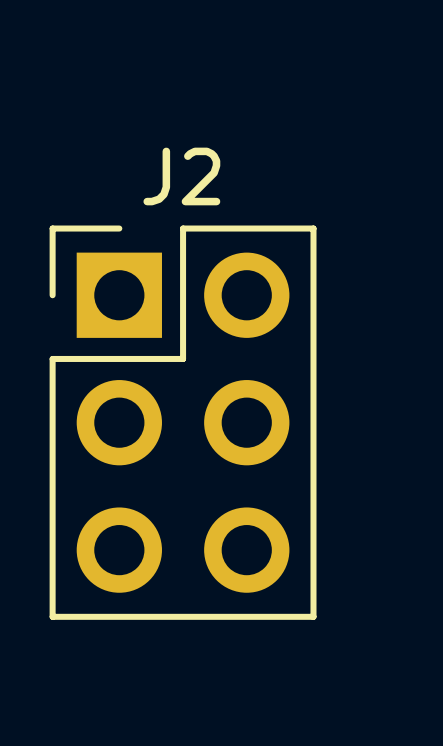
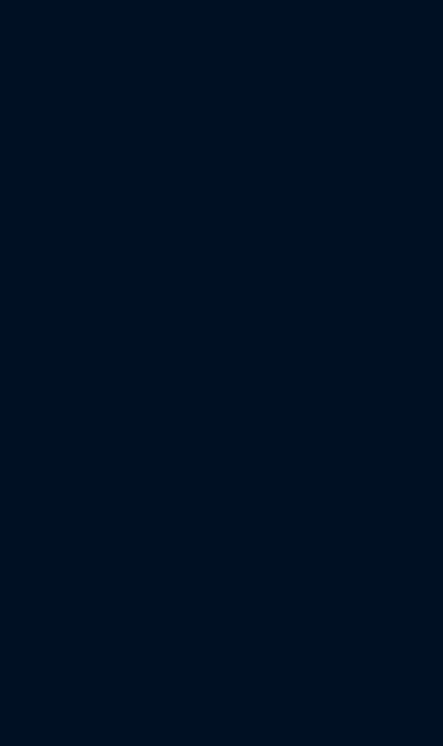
J2: (183, 422) -> none

